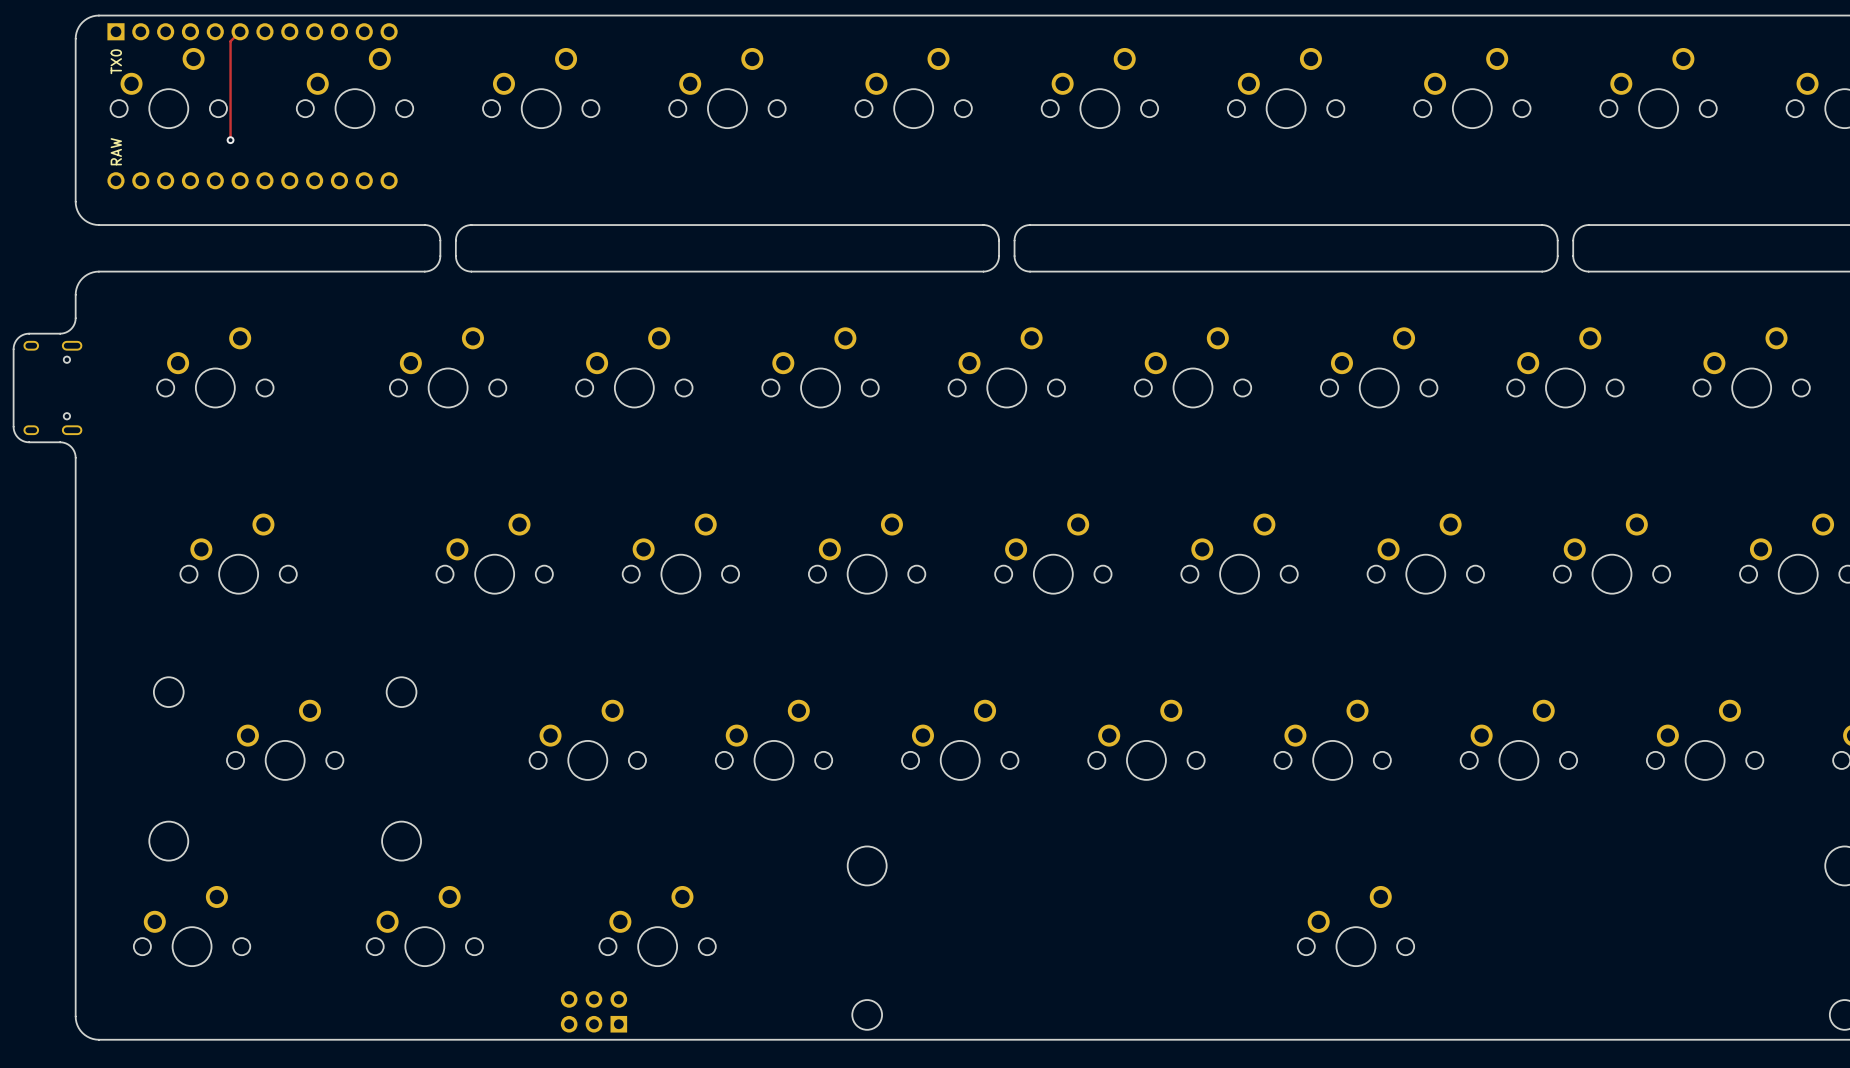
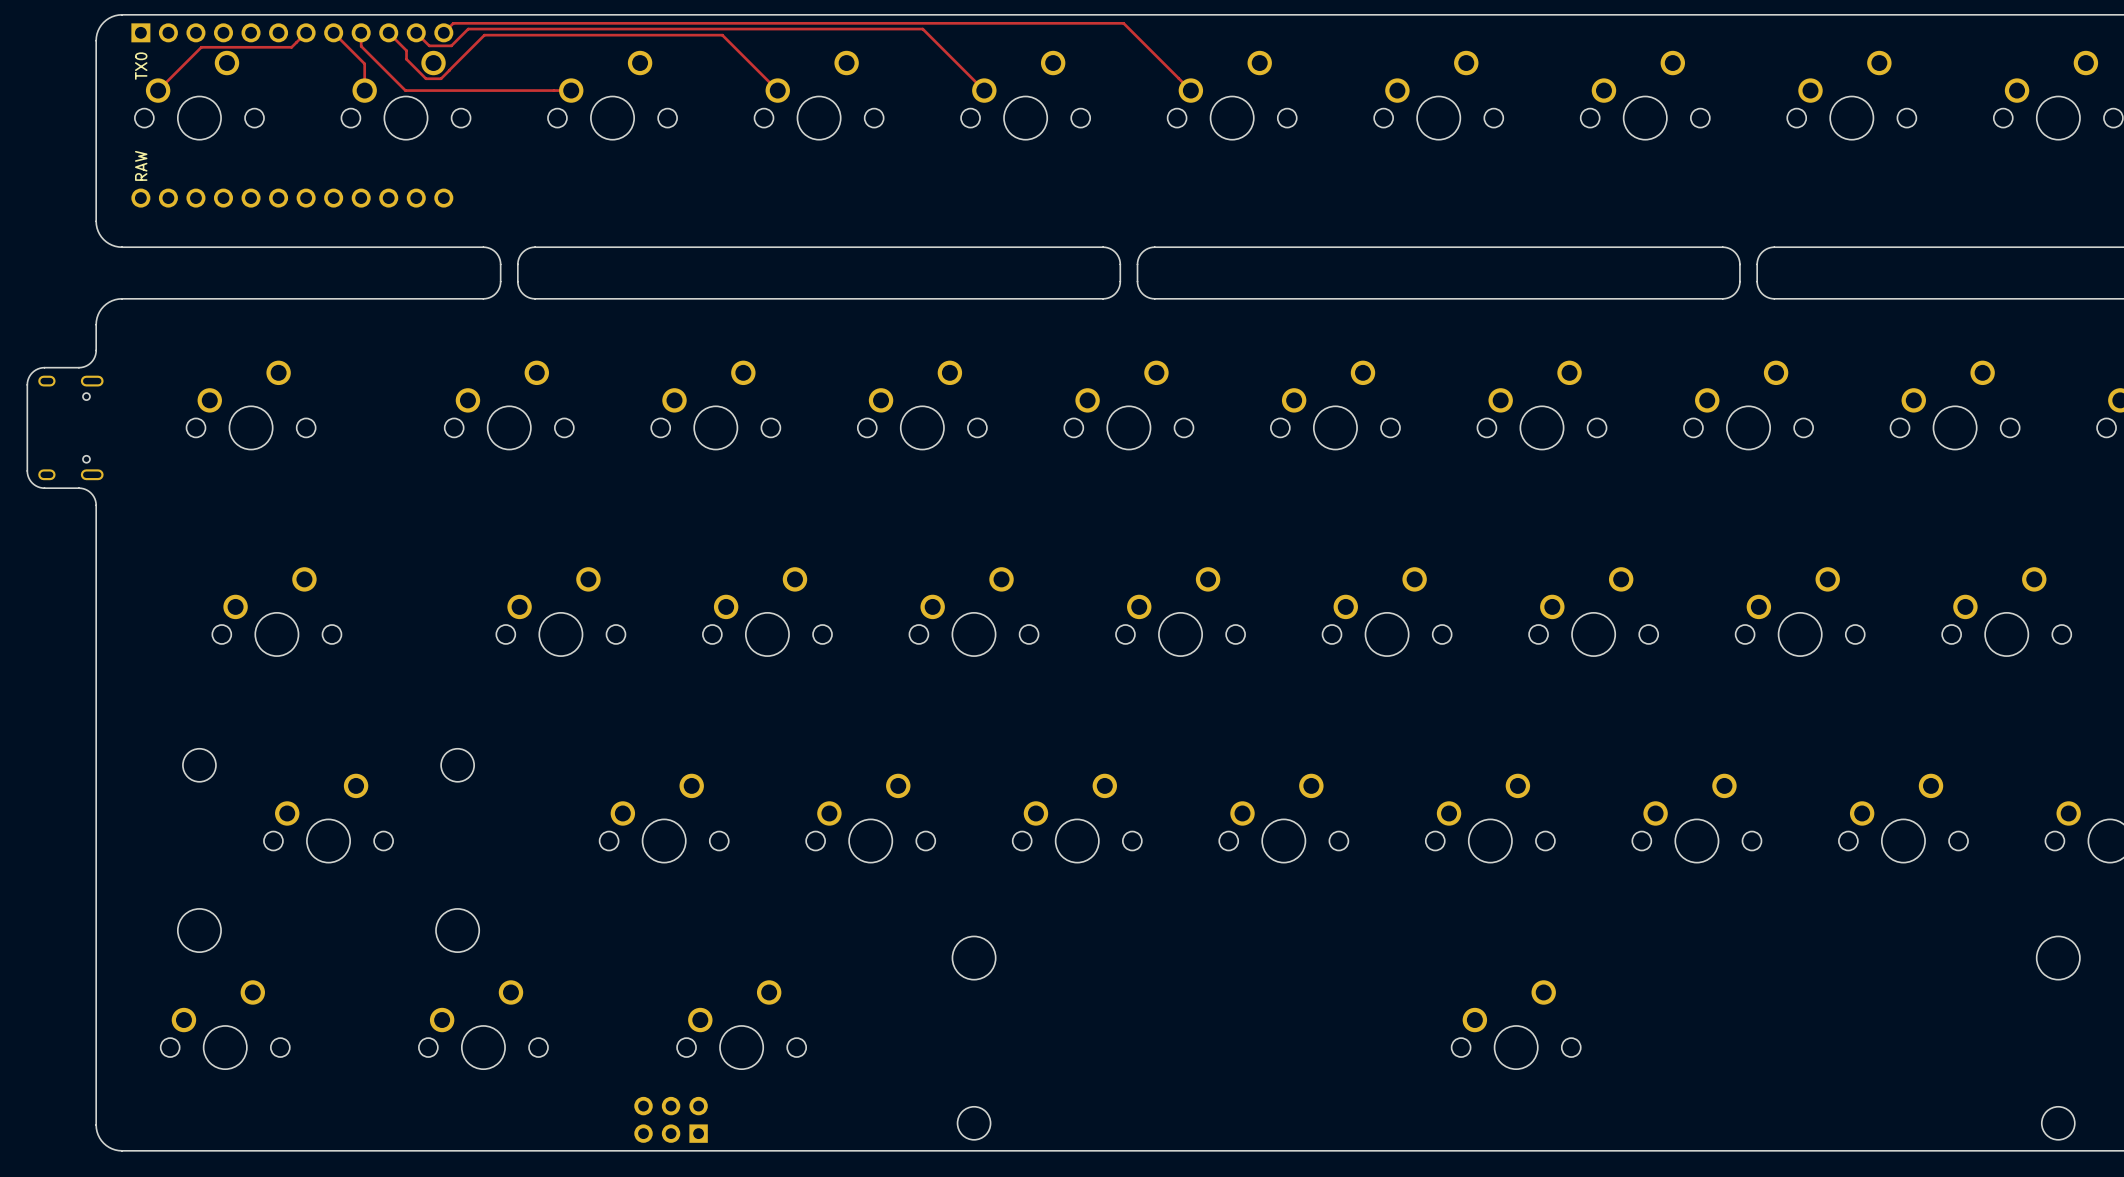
track: (240, 31) (230, 41) (230, 140) -> none
track: none -> (306, 32) (291, 47) (201, 47) (158, 90)
track: none -> (333, 32) (364, 63) (364, 90)
track: none -> (361, 32) (361, 46) (405, 90) (571, 90)
track: none -> (388, 32) (406, 50) (406, 59) (425, 78) (441, 78) (449, 70)
track: none -> (416, 32) (429, 45) (451, 45) (468, 29) (922, 29) (984, 90)
track: none -> (443, 32) (453, 23) (1123, 23) (1190, 90)
track: none -> (449, 70) (484, 35) (722, 35) (777, 90)
via: (230, 140) -> none

